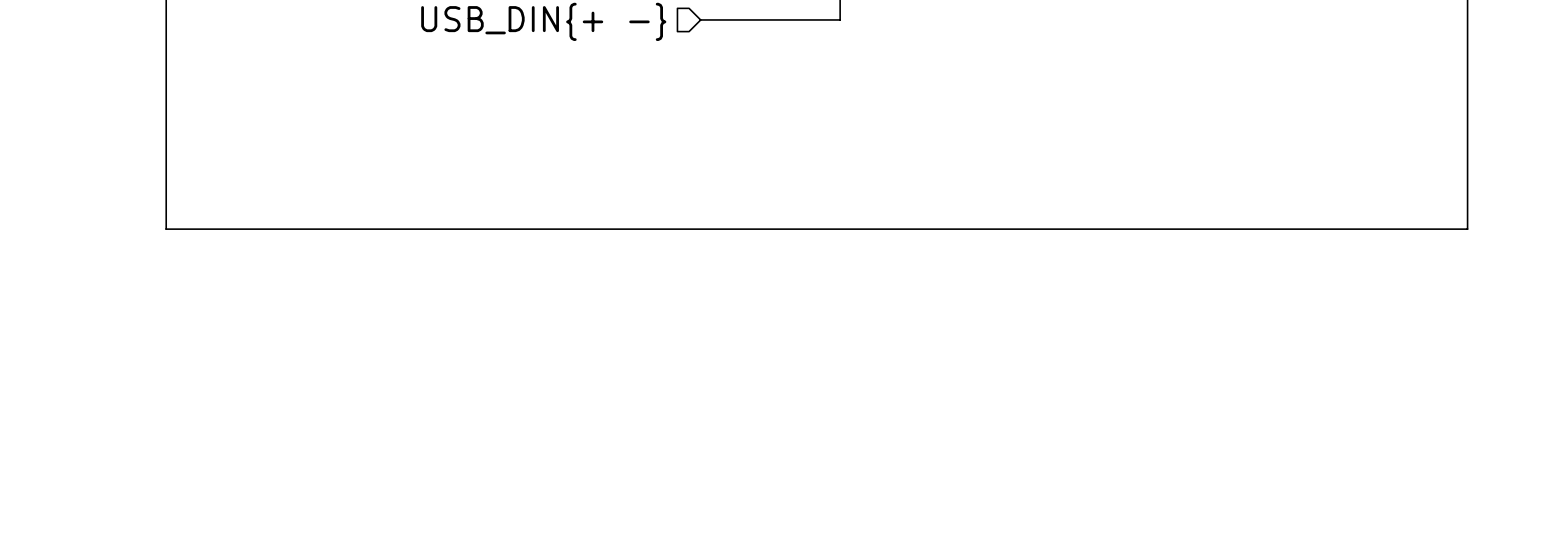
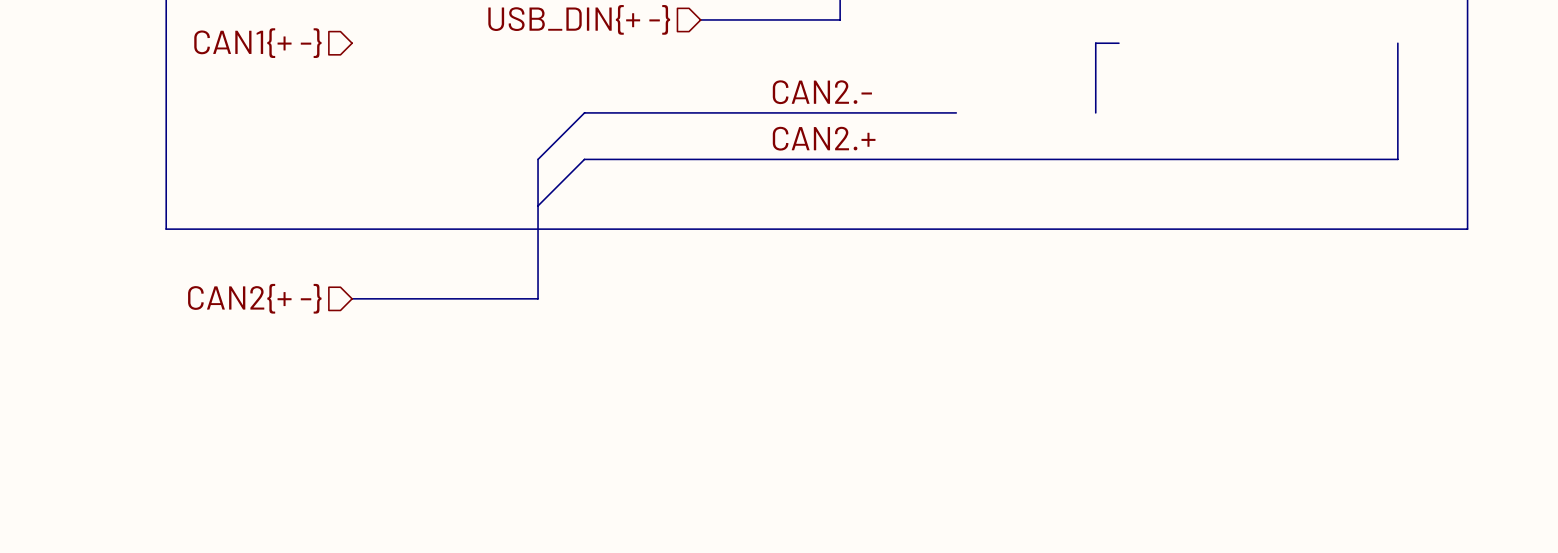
wire: none -> (1118, 43) (1095, 43) (1095, 112)
wire: none -> (1397, 43) (1397, 159) (584, 159) (538, 205)
hierarchical label: none -> CAN1{+ -} (257, 43)
label: none -> CAN2.- (822, 92)
wire: none -> (956, 112) (584, 112) (538, 159)
label: none -> CAN2.+ (824, 138)
bus: none -> (538, 159) (538, 298) (352, 298)
hierarchical label: none -> CAN2{+ -} (254, 298)

